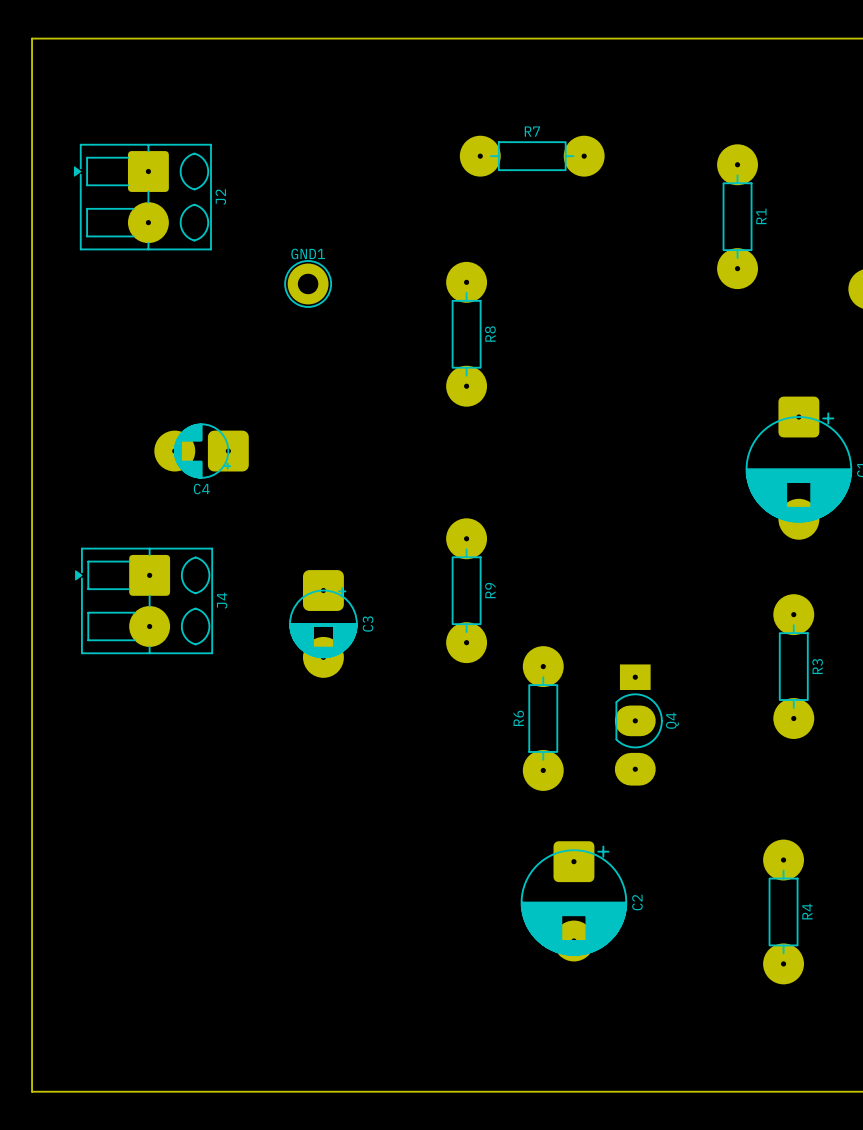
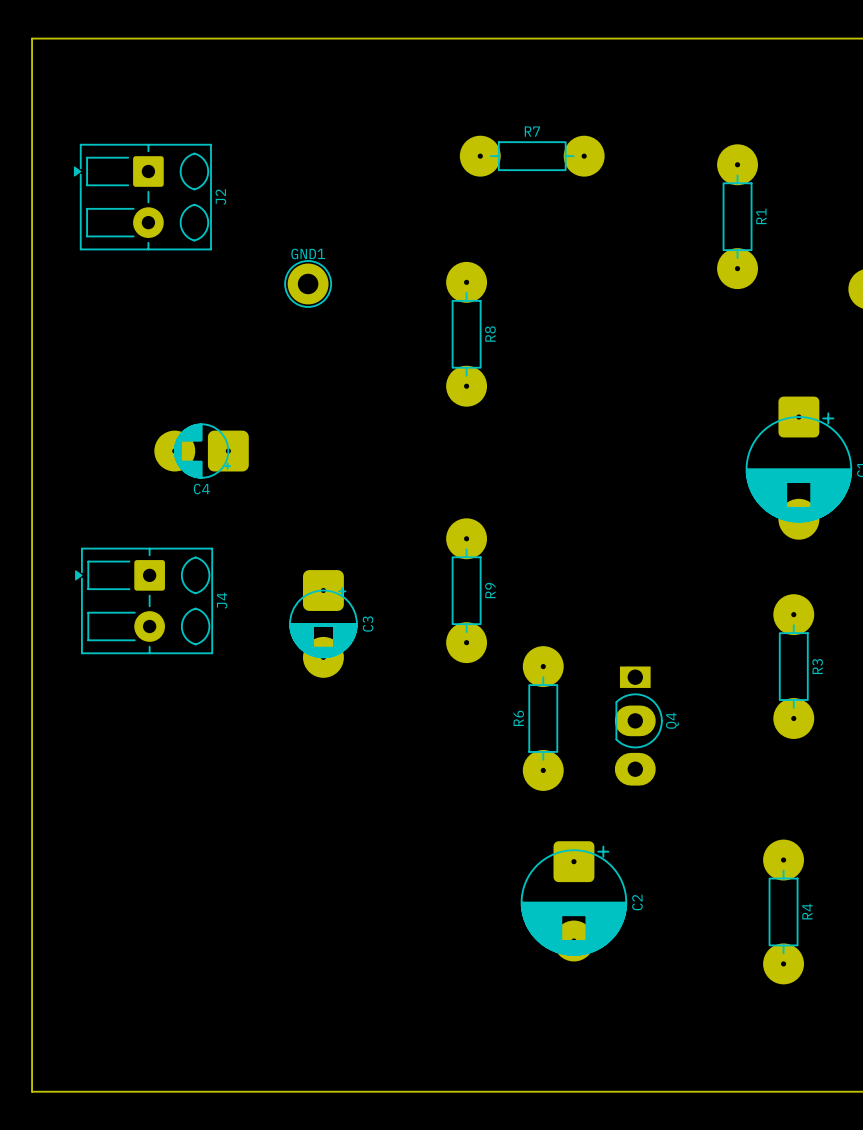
J2 footprint: [73, 144, 212, 251] -> [73, 144, 212, 251]
J4 footprint: [75, 547, 213, 654] -> [75, 547, 213, 654]
Q4 footprint: [614, 664, 663, 786] -> [614, 666, 663, 786]

